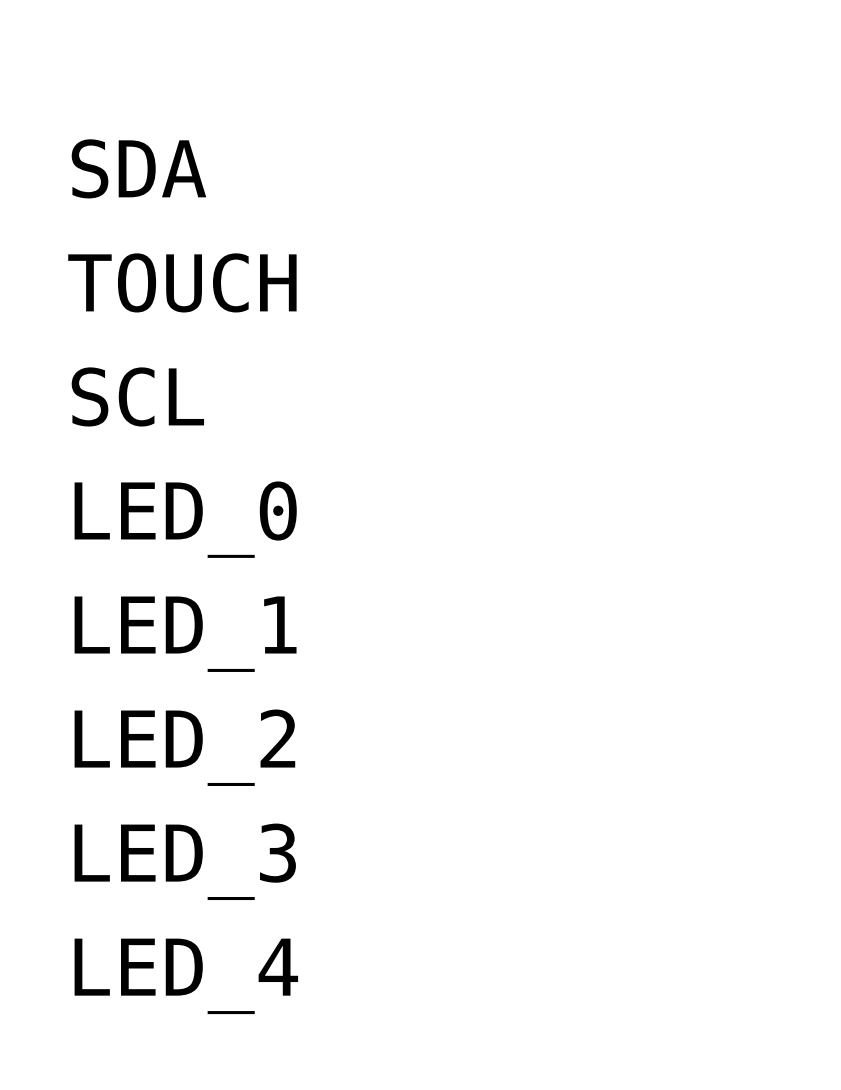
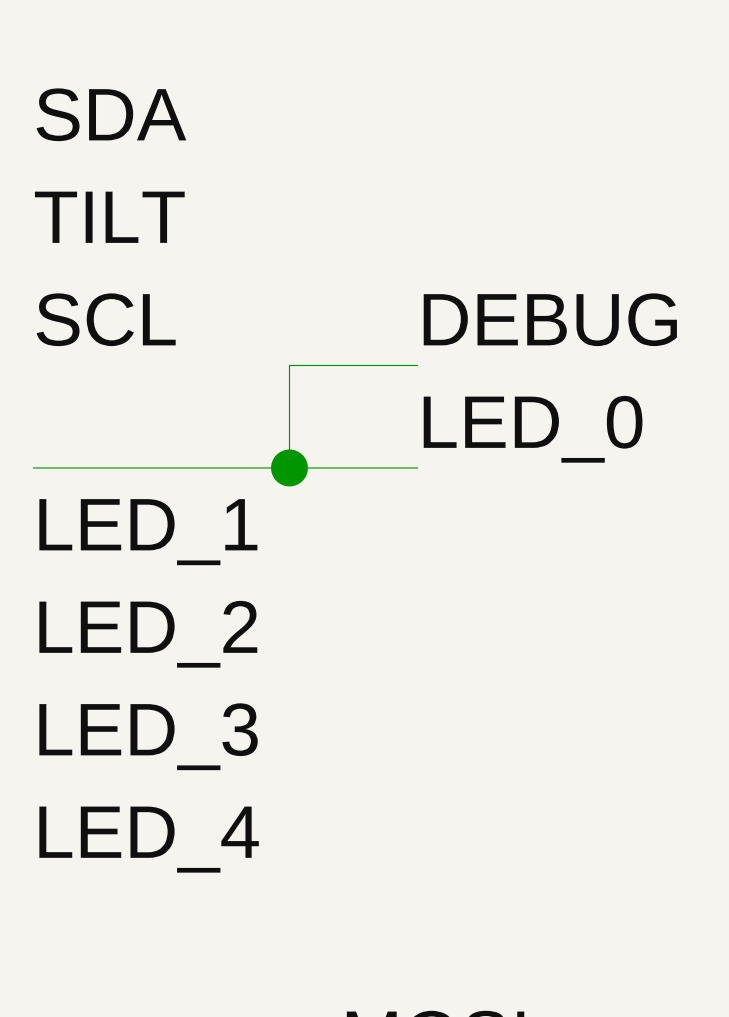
label: TOUCH (182, 282) -> TILT (109, 217)
label: none -> DEBUG (550, 319)
wire: none -> (417, 365) (289, 365) (289, 467)
label position: LED_0 (185, 519) -> LED_0 (533, 429)
wire: none -> (33, 467) (417, 467)
junction: none -> (289, 467)

